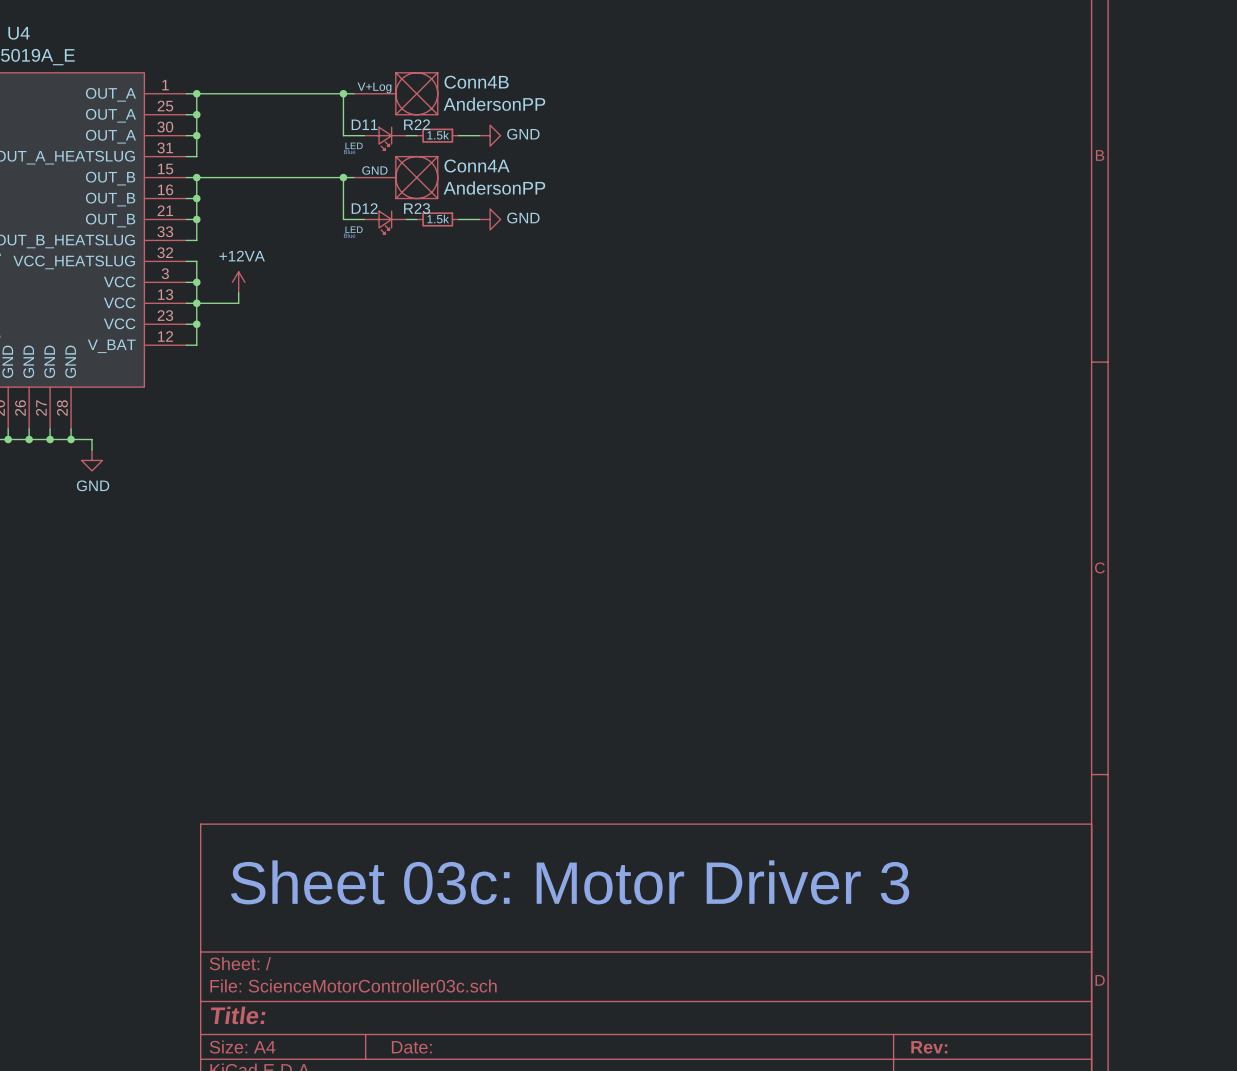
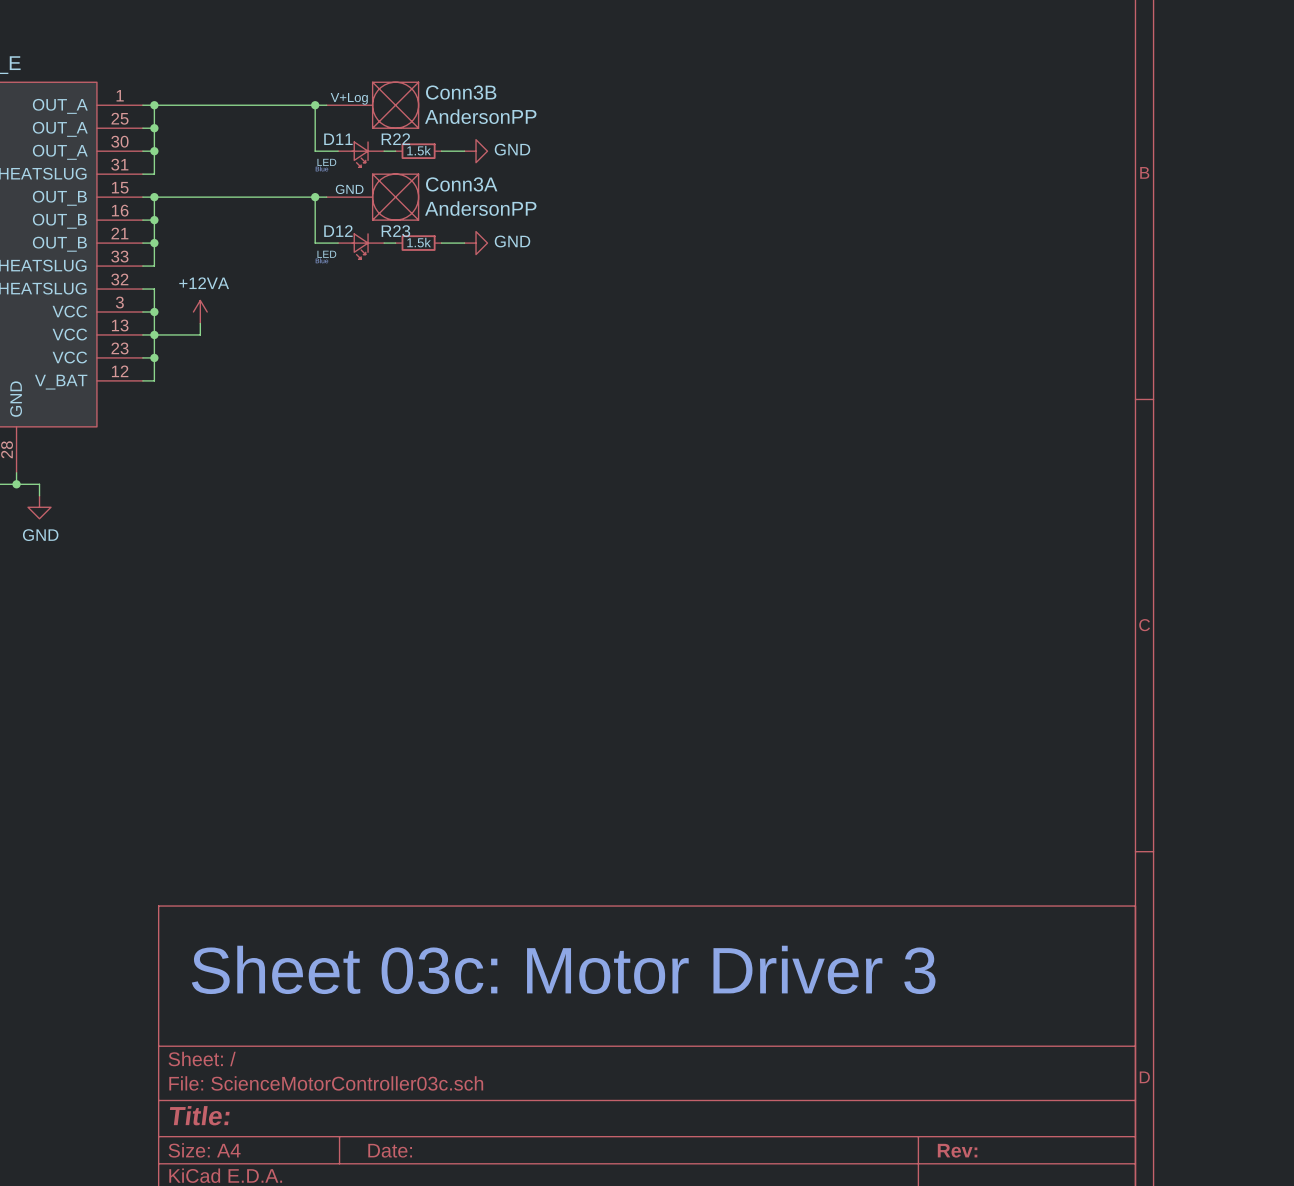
Conn4B name: Conn4B (476, 82) -> Conn3B (461, 92)
Conn4A name: Conn4A (477, 165) -> Conn3A (461, 184)

